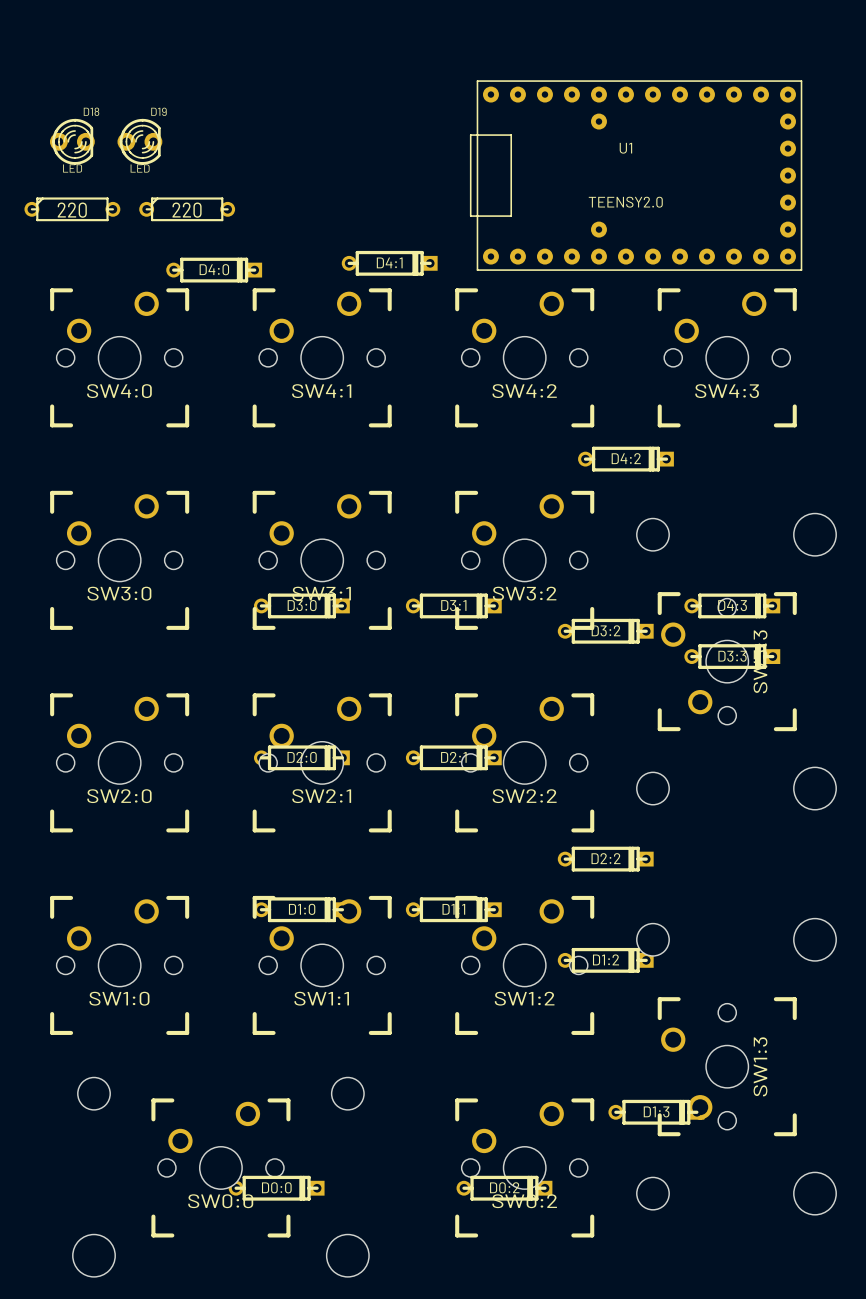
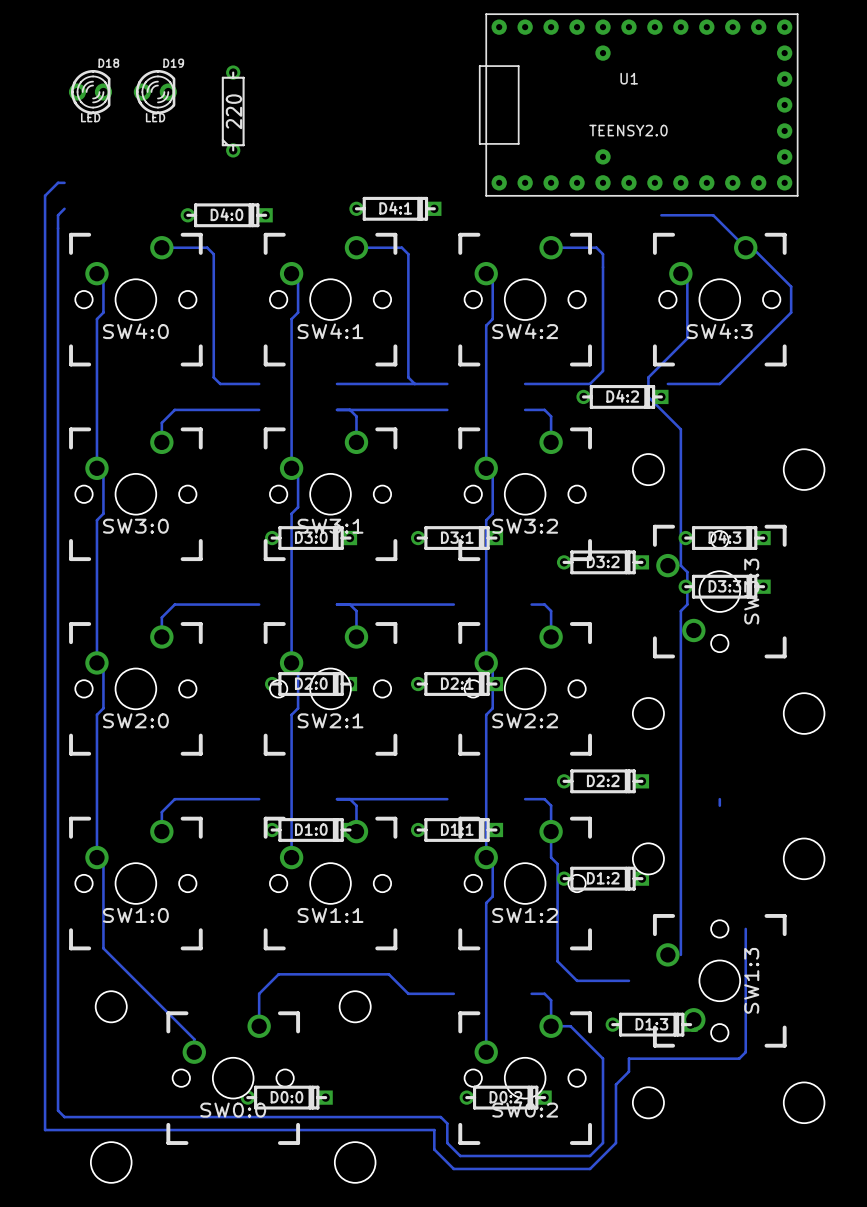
U1 position: (636, 175) -> (638, 105)
part: 220 (72, 209) -> none
part rotation: 0° (187, 209) -> 90° counterclockwise (233, 111)
part position: (187, 209) -> (233, 111)
bottom track: none -> (64, 182) (58, 182) (45, 195) (45, 1130) (434, 1130) (434, 1149) (453, 1168) (590, 1168) (615, 1143) (615, 1084) (628, 1071) (628, 1058) (739, 1058) (745, 1052) (745, 928)
bottom track: none -> (64, 208) (58, 215) (58, 1110) (64, 1117) (440, 1117) (447, 1123) (447, 1143) (460, 1156) (590, 1156) (603, 1143) (603, 1058) (570, 1026) (551, 1026) (551, 1000) (544, 993) (531, 993)
bottom track: none -> (661, 215) (713, 215) (745, 247) (752, 247) (791, 286) (791, 312) (719, 383) (667, 383)
bottom track: none -> (161, 247) (207, 247) (213, 254) (213, 377) (220, 383) (259, 383)
bottom track: none -> (356, 247) (401, 247) (408, 254) (408, 377) (414, 383)
bottom track: none -> (551, 247) (596, 247) (603, 254) (603, 370) (590, 383) (525, 383)
bottom track: none -> (96, 273) (103, 280) (103, 312) (96, 319) (96, 468) (103, 474) (103, 513) (96, 520) (96, 662) (103, 669) (103, 708) (96, 714) (96, 857) (103, 864) (103, 948) (194, 1039) (194, 1052)
bottom track: none -> (291, 273) (298, 280) (298, 312) (291, 319) (291, 468) (298, 474) (298, 507) (291, 513) (291, 662) (298, 669) (298, 708) (291, 714) (291, 857)
bottom track: none -> (486, 273) (492, 280) (492, 319) (486, 325) (486, 468) (492, 474) (492, 513) (486, 520) (486, 662) (492, 669) (492, 708) (486, 714) (486, 857) (492, 864) (492, 896) (486, 902) (486, 1052)
bottom track: none -> (680, 273) (687, 280) (687, 338) (648, 377) (648, 396) (680, 429) (680, 565) (687, 572) (687, 604) (680, 611) (680, 954)
bottom track: none -> (337, 383) (447, 383)
bottom track: none -> (259, 409) (174, 409) (161, 422) (161, 442)
bottom track: none -> (337, 409) (447, 409)
bottom track: none -> (349, 409) (356, 416) (356, 442)
bottom track: none -> (525, 409) (544, 409) (551, 416) (551, 442)
bottom track: none -> (259, 604) (174, 604) (161, 617) (161, 636)
bottom track: none -> (337, 604) (453, 604)
bottom track: none -> (349, 604) (356, 611) (356, 636)
bottom track: none -> (531, 604) (544, 604) (551, 611) (551, 636)
bottom track: none -> (259, 799) (174, 799) (161, 812) (161, 831)
bottom track: none -> (337, 799) (447, 799)
bottom track: none -> (349, 799) (356, 805) (356, 831)
bottom track: none -> (525, 799) (544, 799) (551, 805) (551, 857) (557, 864) (557, 961) (577, 980) (628, 980)
bottom track: none -> (719, 799) (719, 805)
bottom track: none -> (453, 993) (408, 993) (388, 974) (278, 974) (259, 993) (259, 1026)

